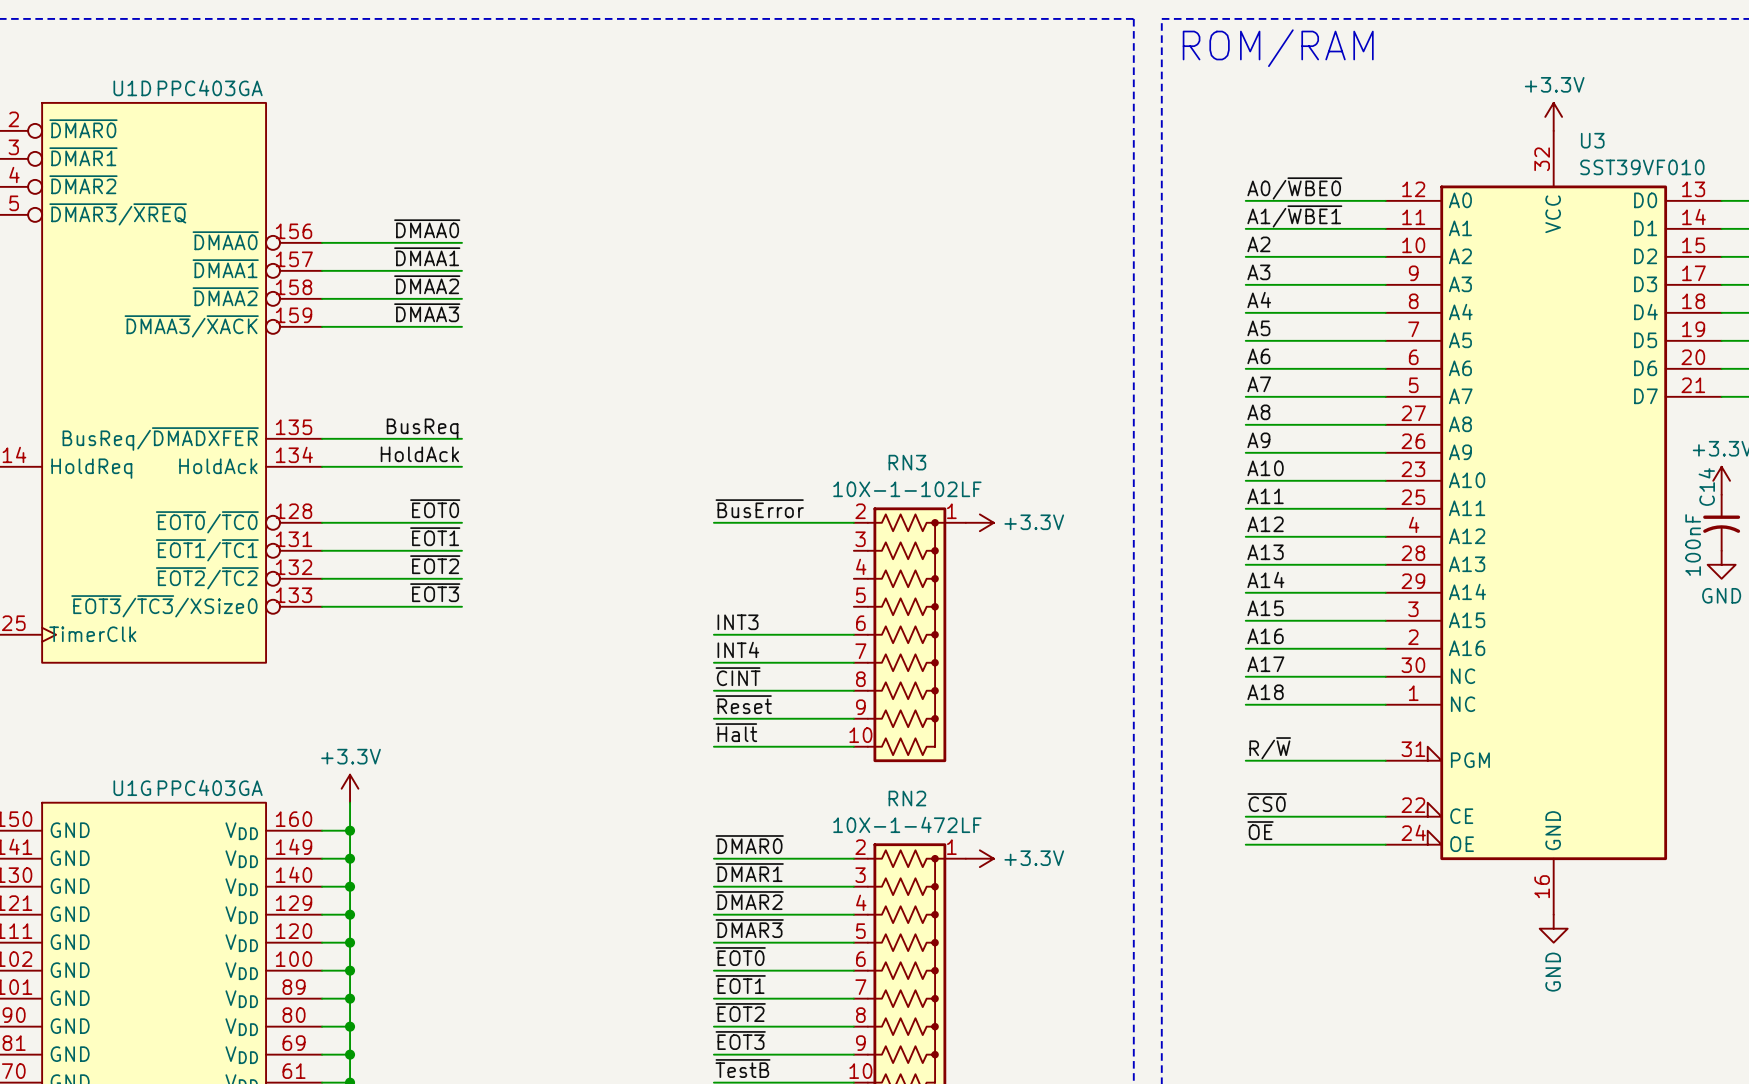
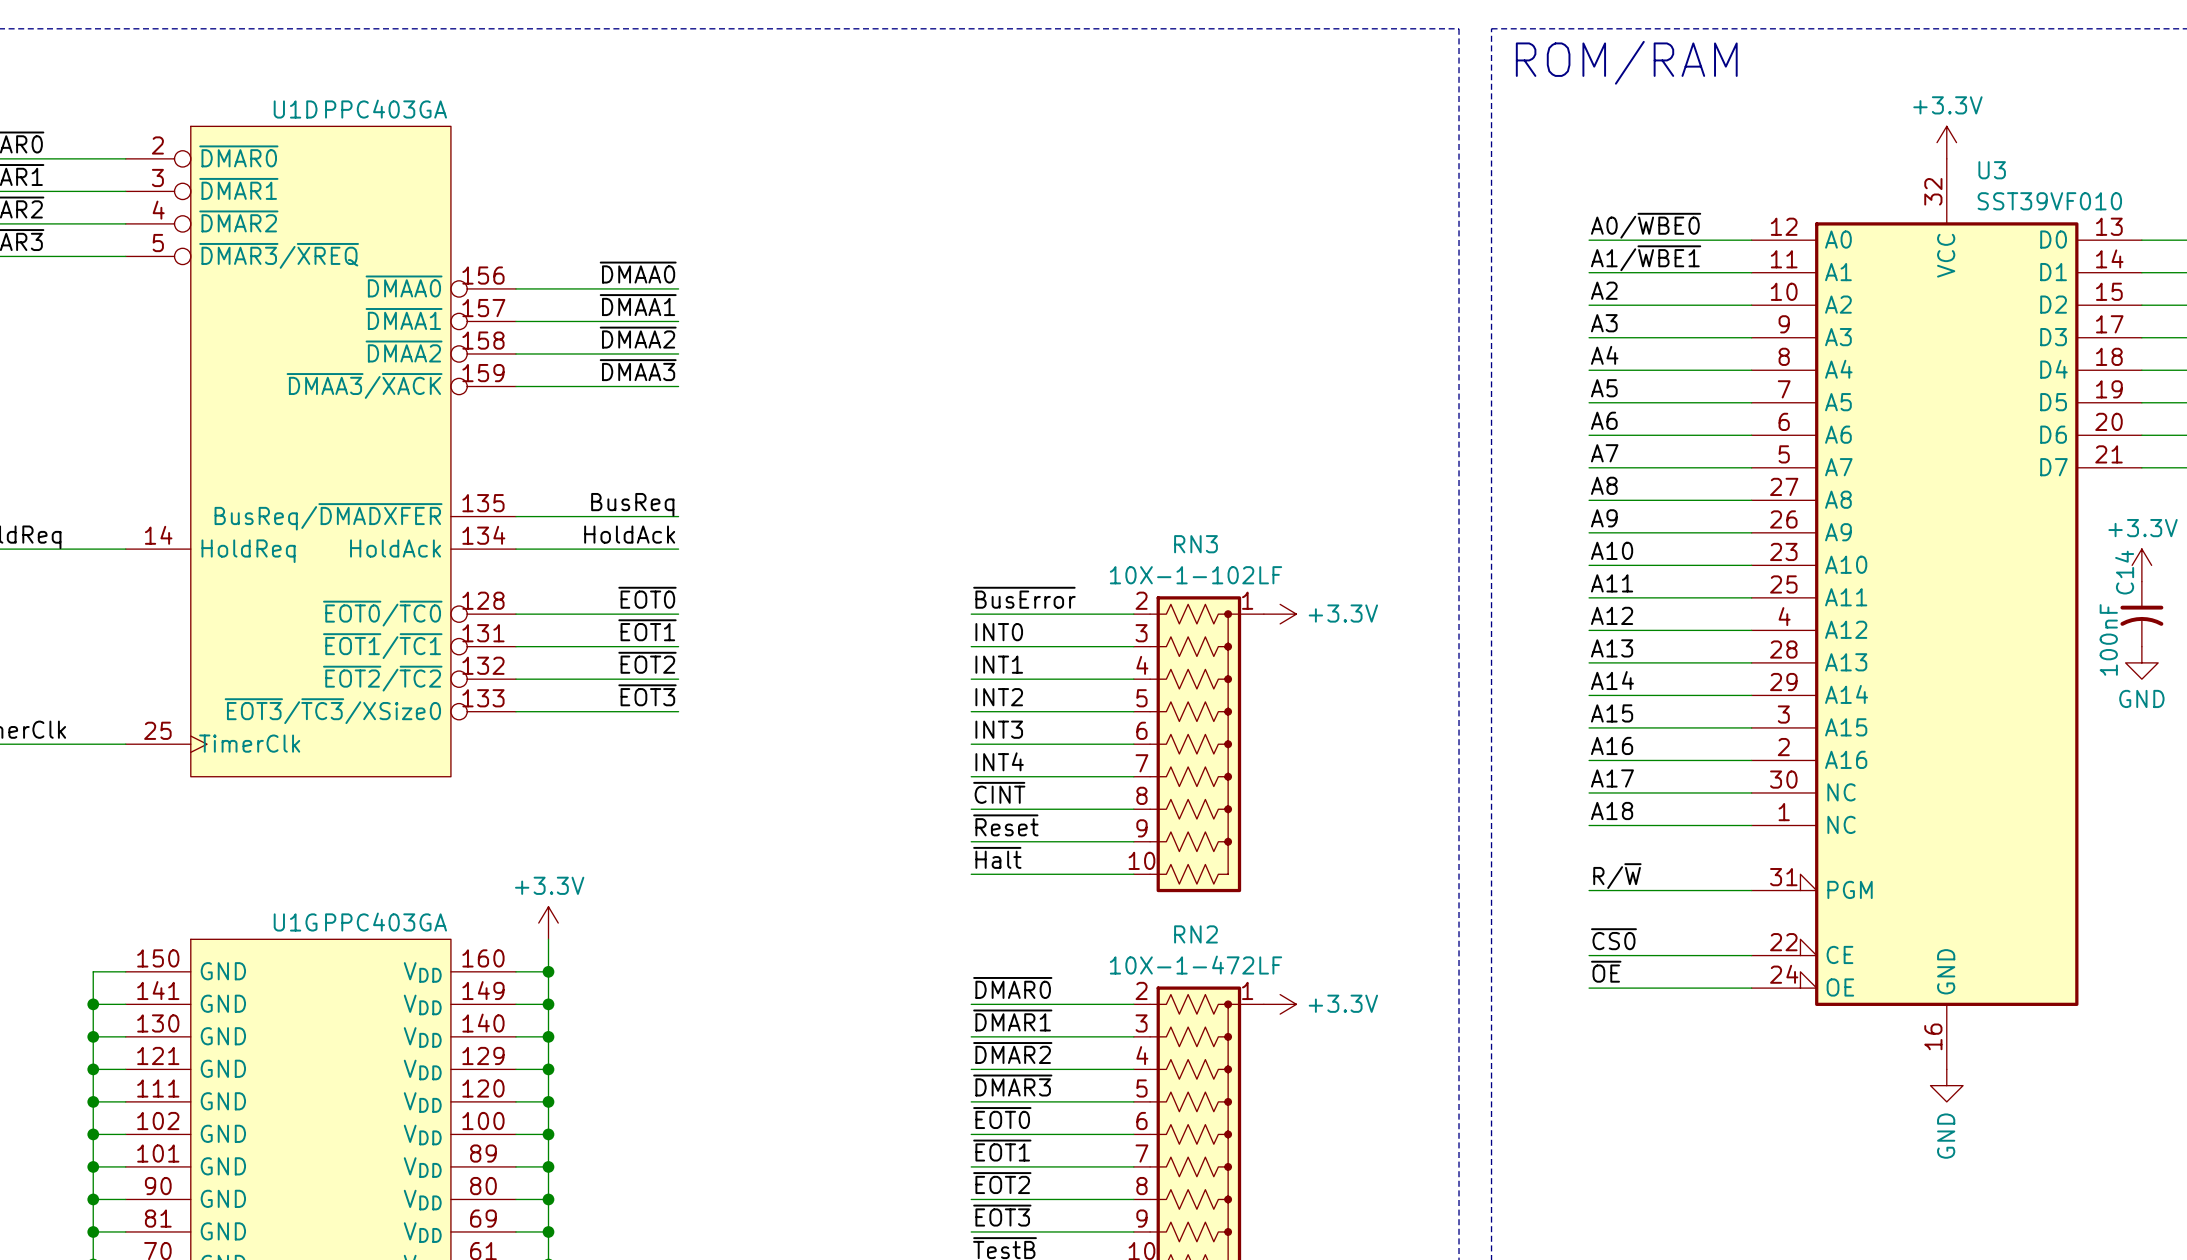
label: none -> INT0 (999, 632)
wire: none -> (971, 646) (1133, 646)
label: none -> INT1 (999, 664)
wire: none -> (971, 679) (1133, 679)
label: none -> INT2 (999, 697)
wire: none -> (971, 711) (1133, 711)

